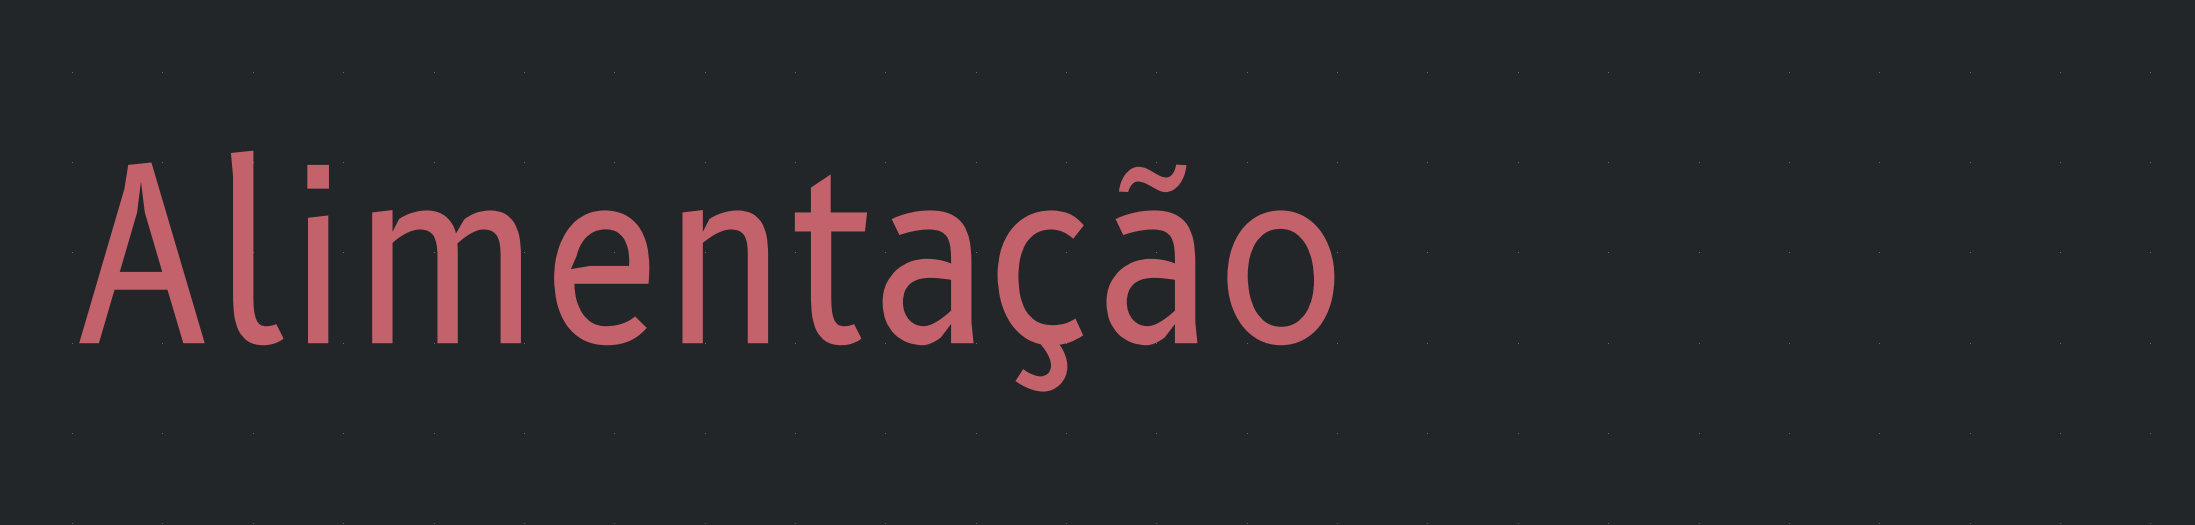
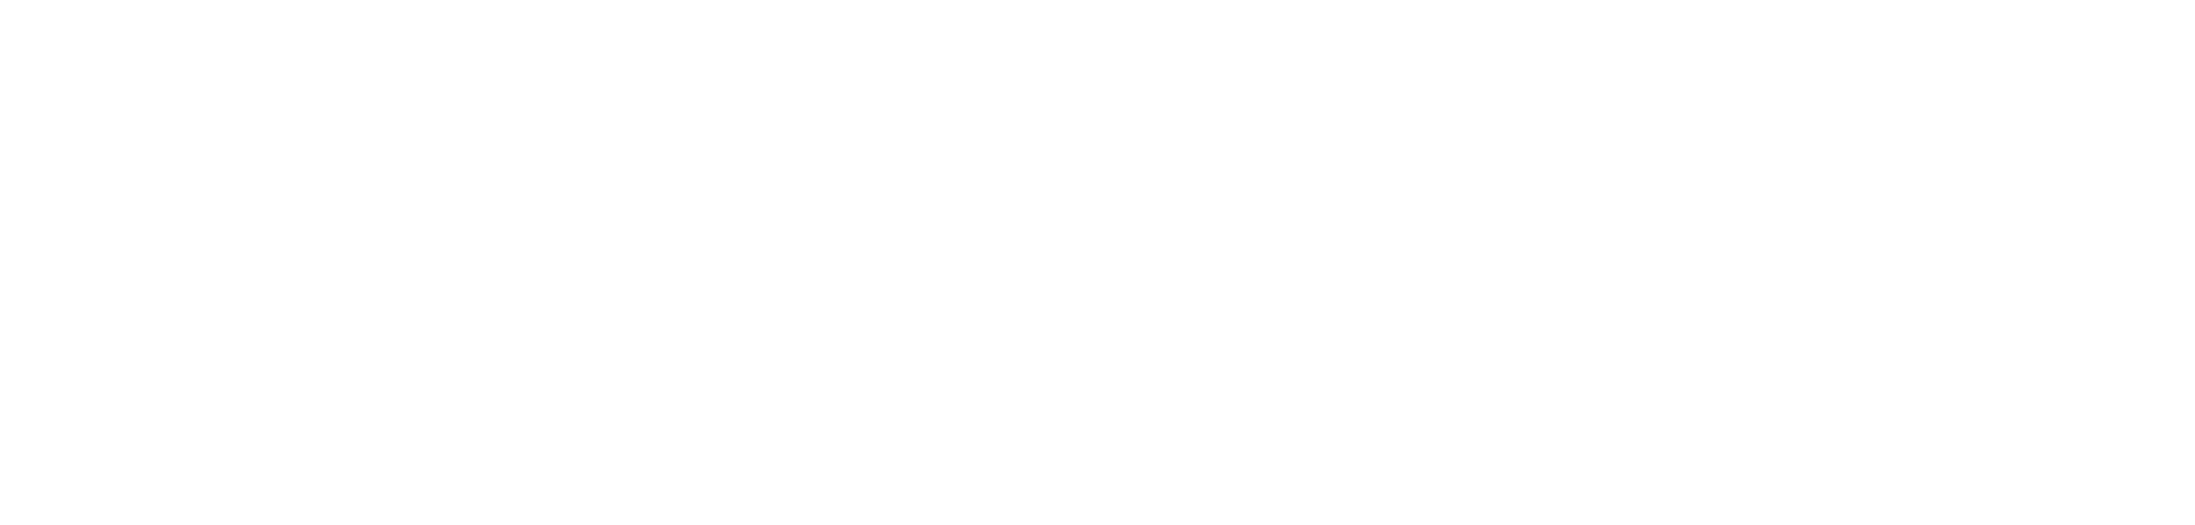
text: Alimentação (706, 271) -> none

